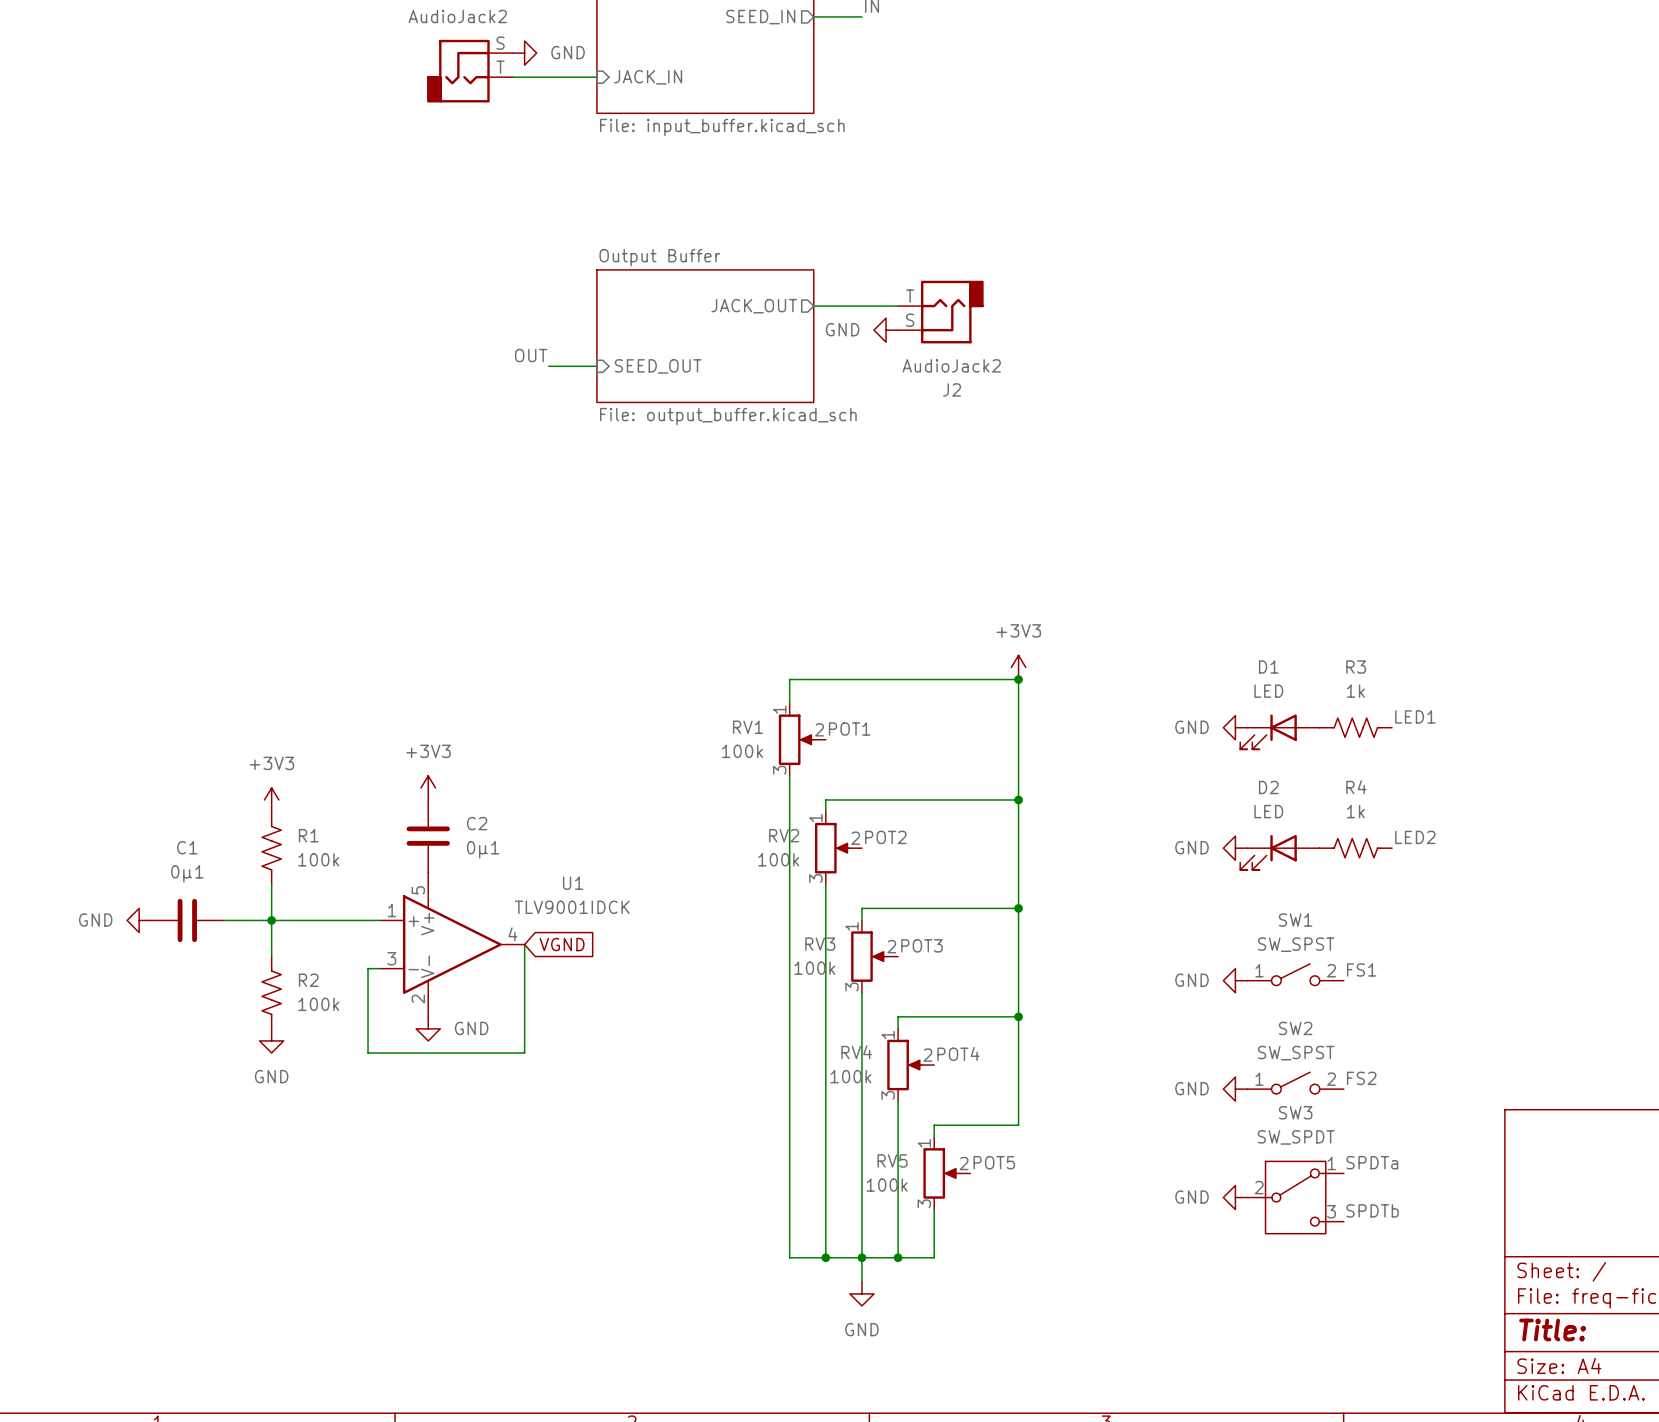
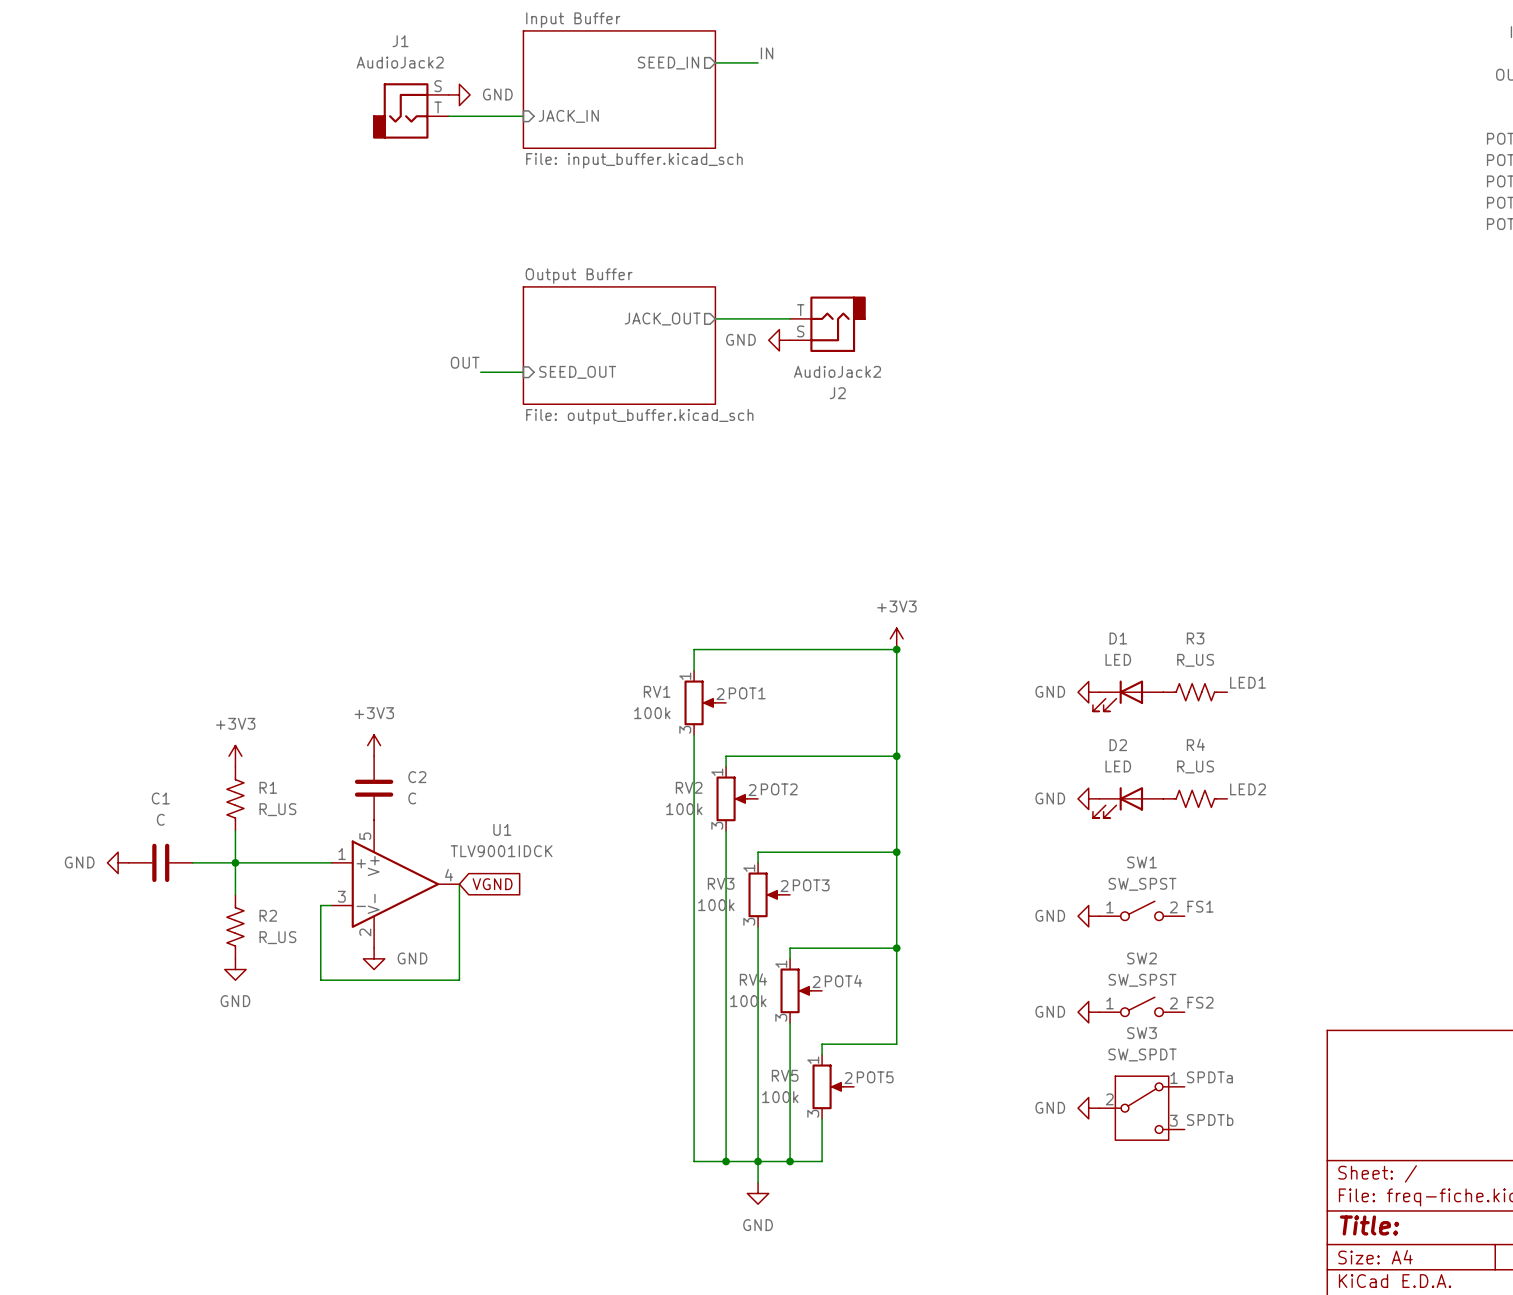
R3 value: 1k (1355, 691) -> R_US (1195, 660)
R4 value: 1k (1355, 811) -> R_US (1195, 766)
C2 value: 0µ1 (483, 849) -> C (412, 798)
R1 value: 100k (318, 859) -> R_US (277, 809)
C1 value: 0µ1 (187, 873) -> C (160, 819)
R2 value: 100k (318, 1004) -> R_US (277, 937)

